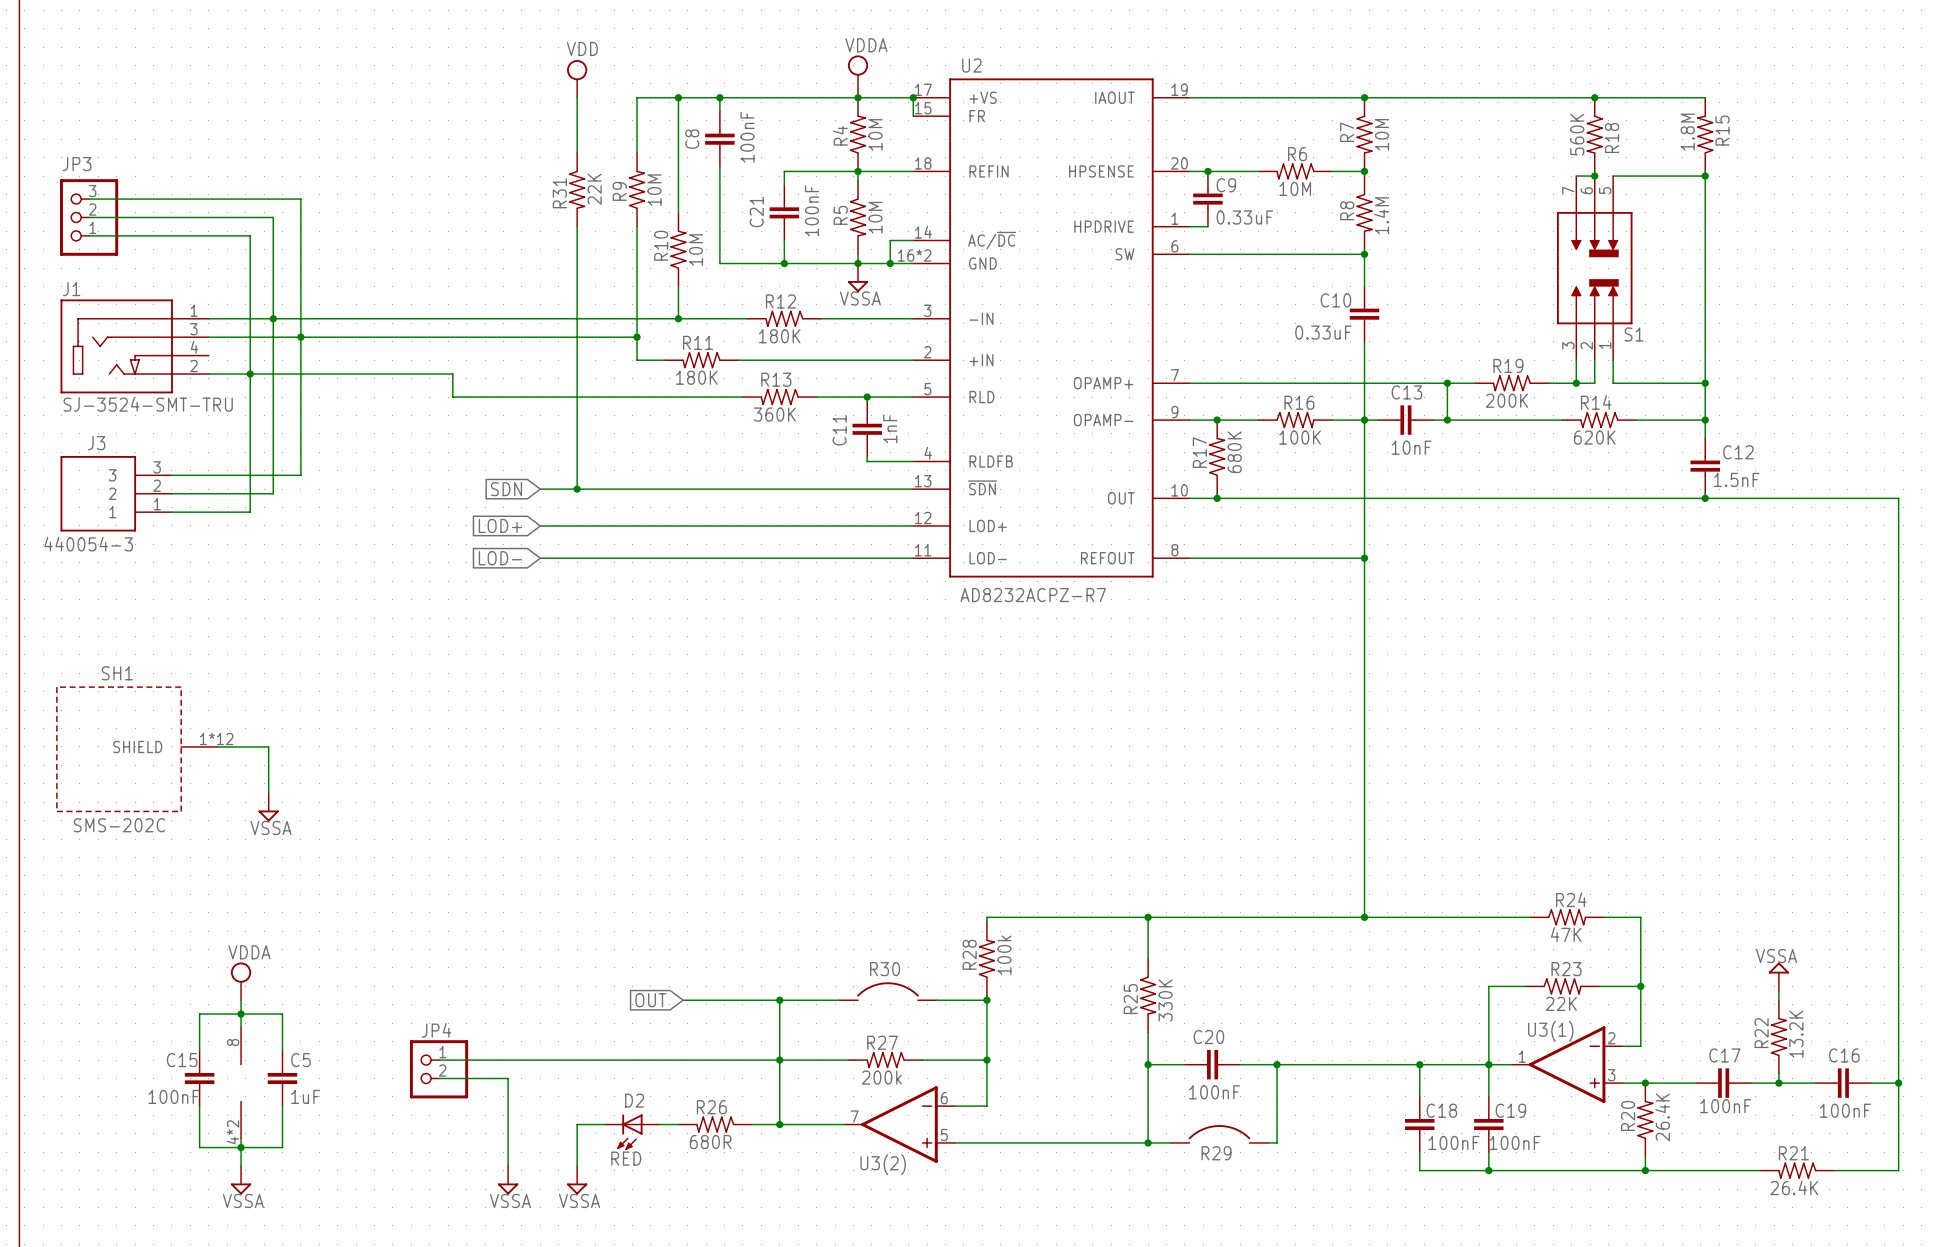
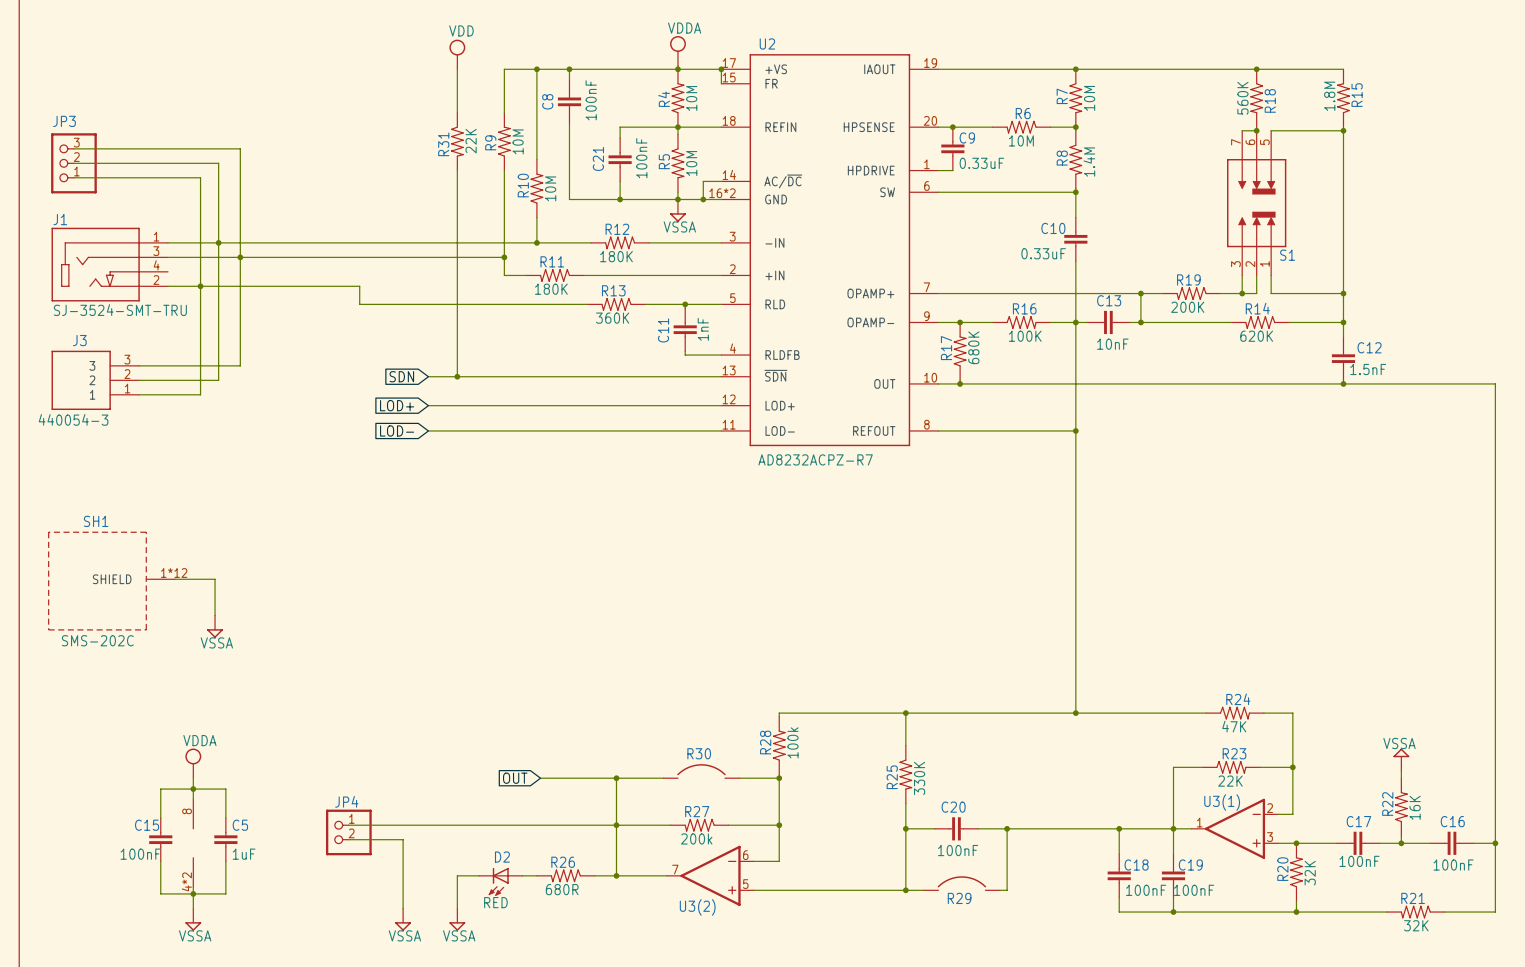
R22 value: 13.2K (1796, 1034) -> 16K (1415, 807)
R20 value: 26.4K (1662, 1117) -> 32K (1310, 873)
R21 value: 26.4K (1794, 1187) -> 32K (1416, 925)

